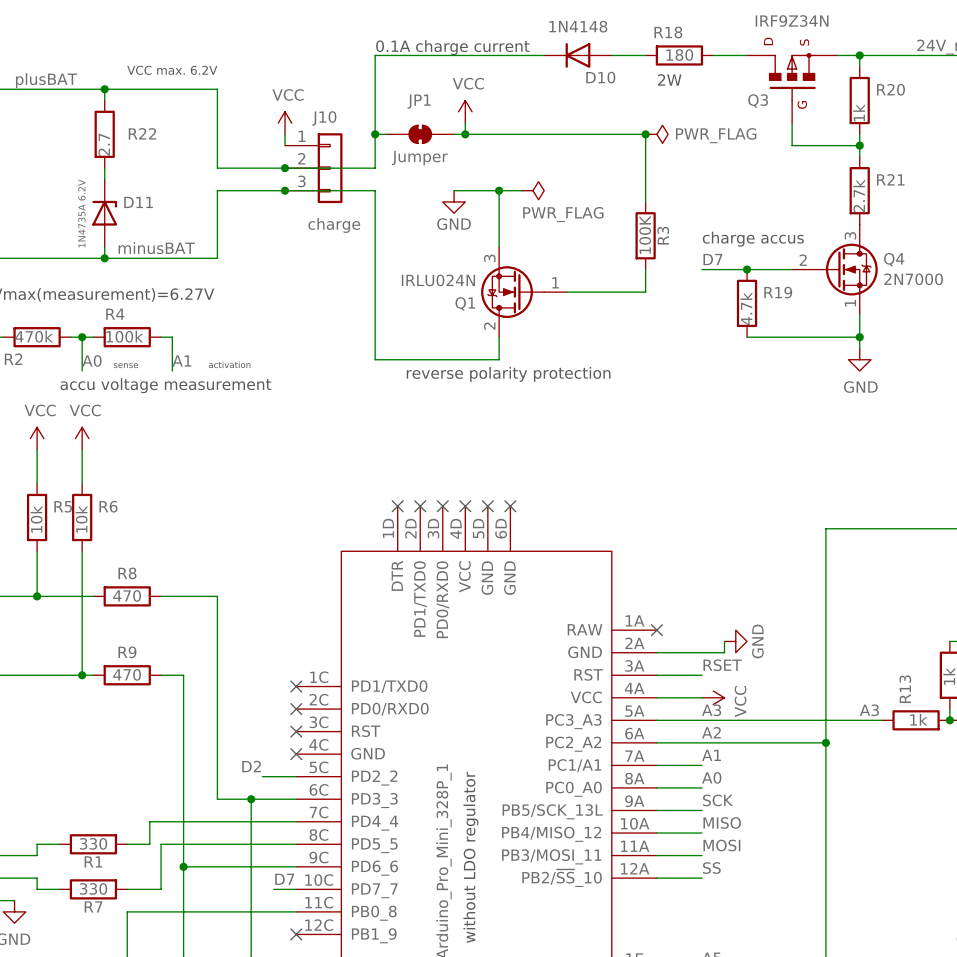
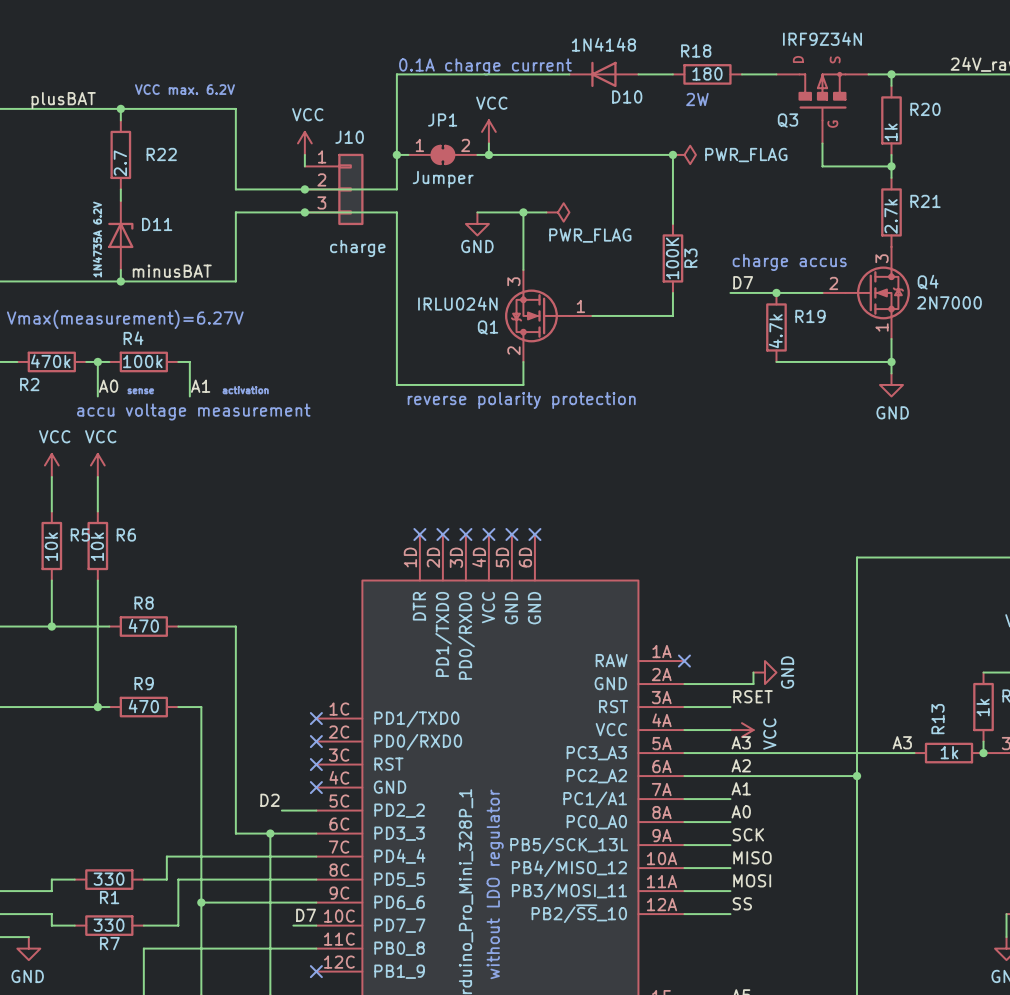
JP1 pin number: none -> 2 (465, 145)
JP1 pin number: none -> 1 (419, 145)

